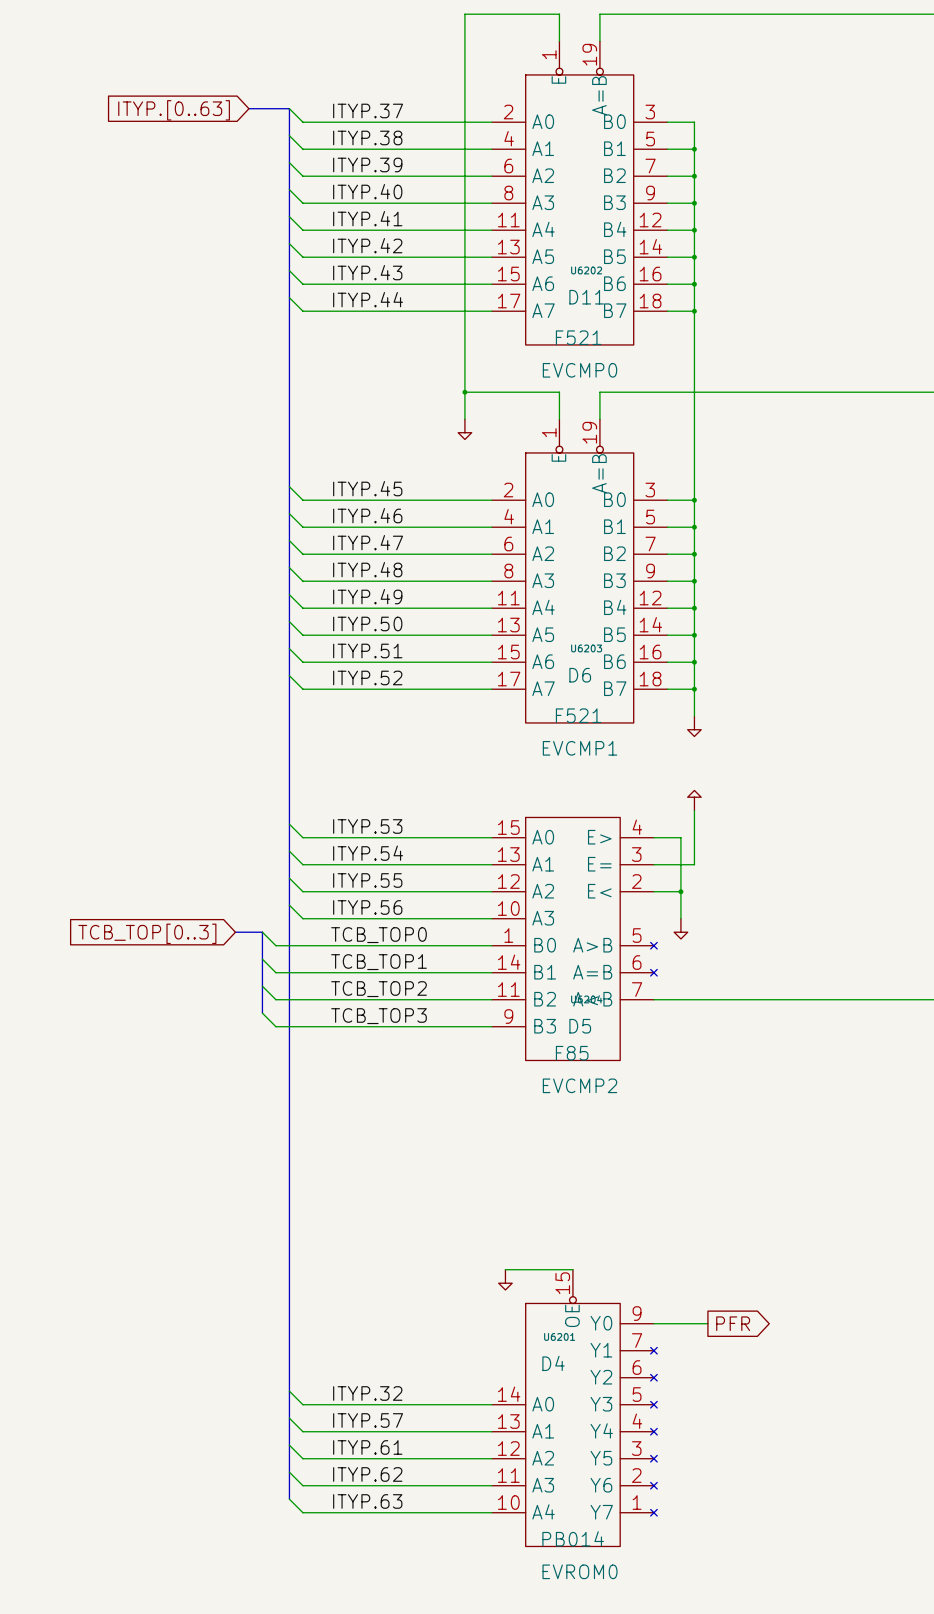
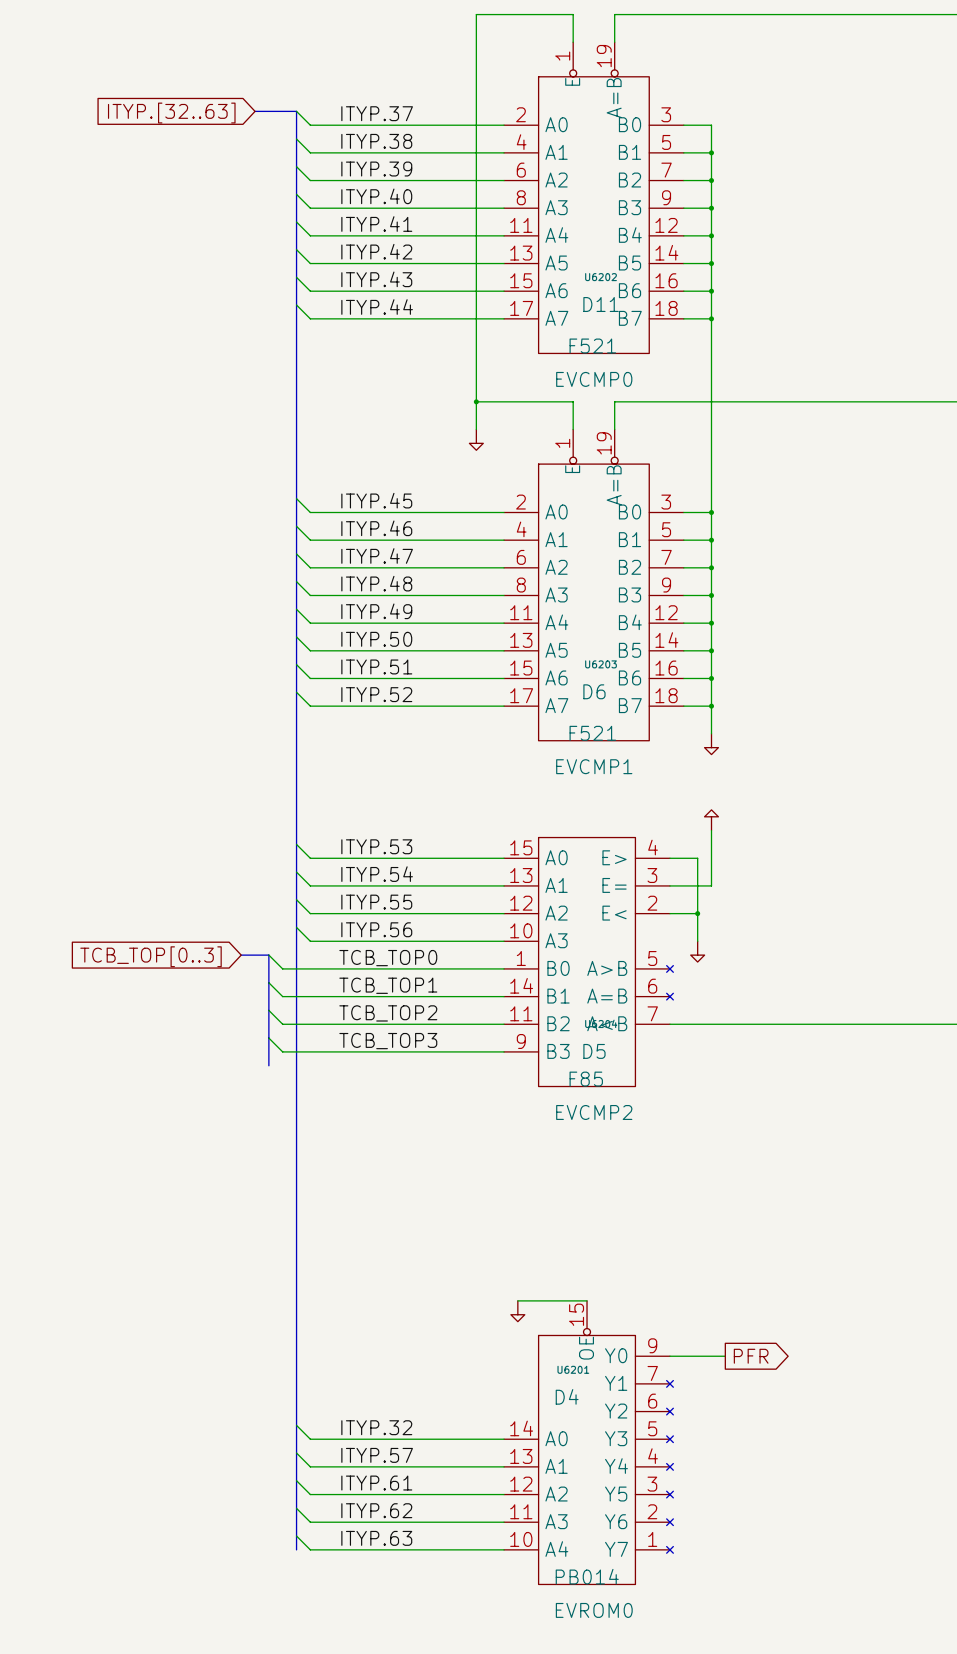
global label: ITYP.[0..63] (174, 110) -> ITYP.[32..63] (171, 113)
bus: none -> (268, 1038) (268, 1065)
bus: none -> (296, 1536) (296, 1549)

